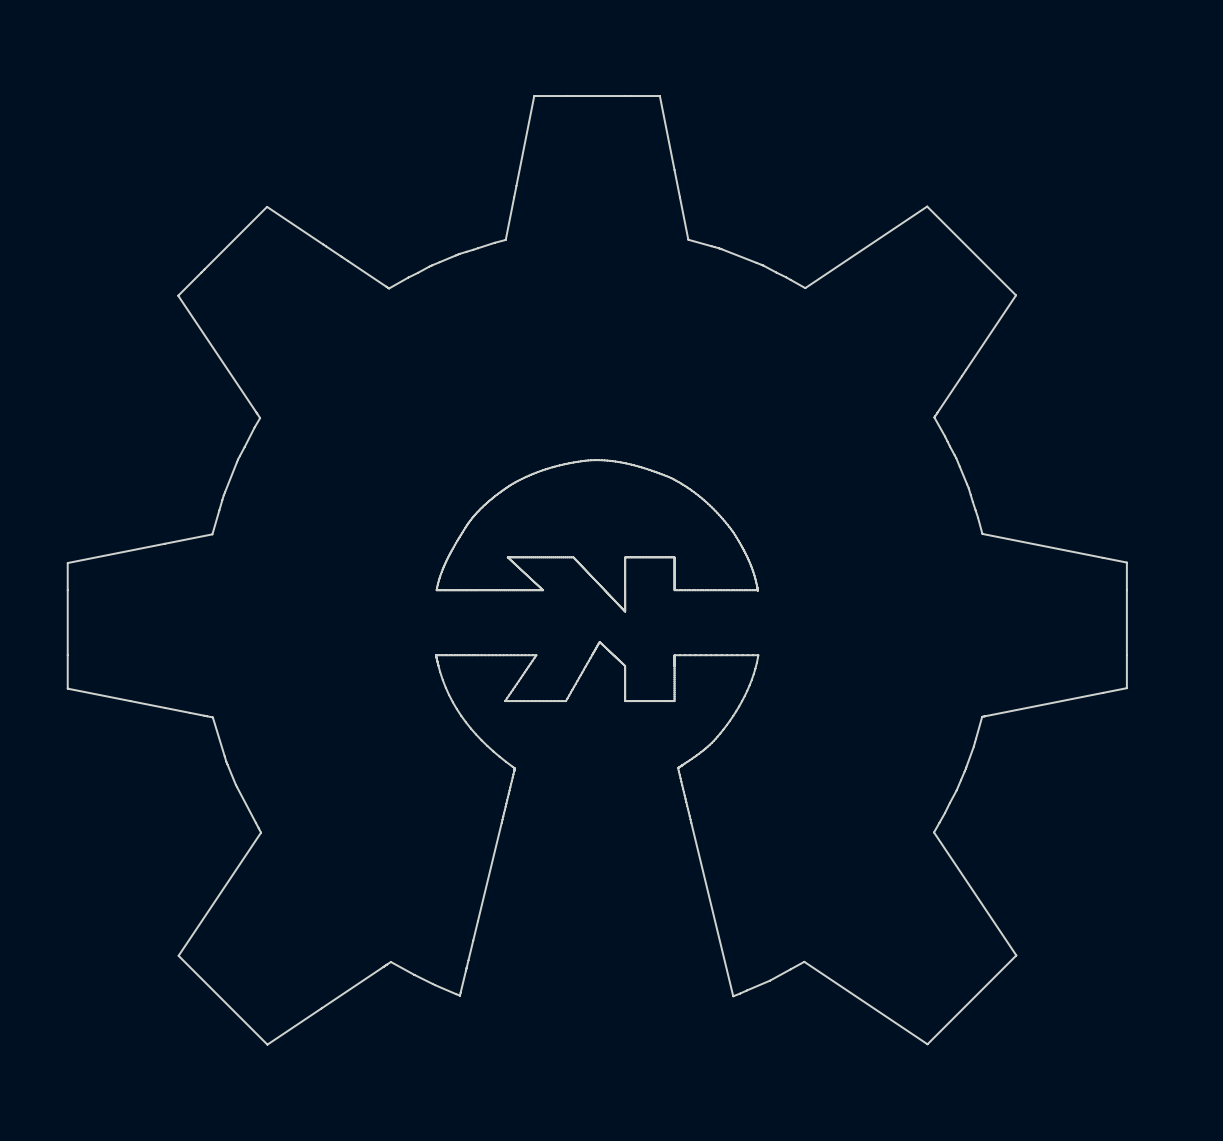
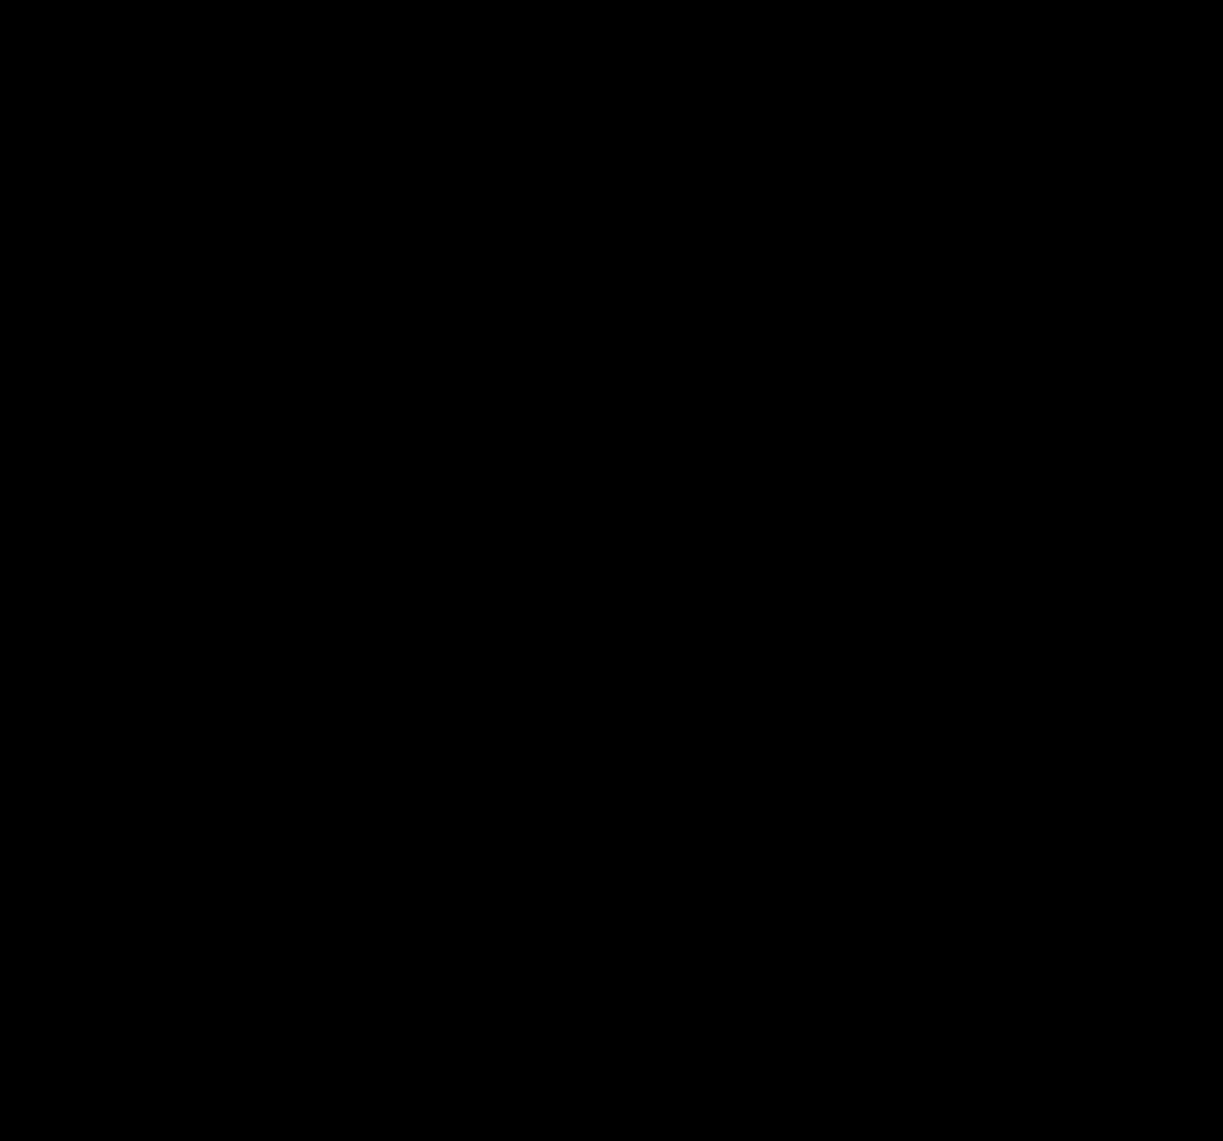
drawing: [66, 95, 1128, 1046] -> none

